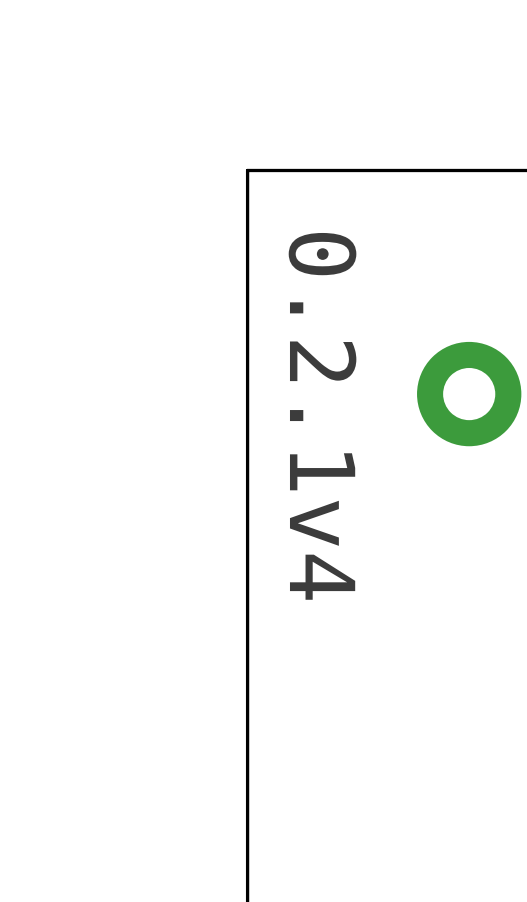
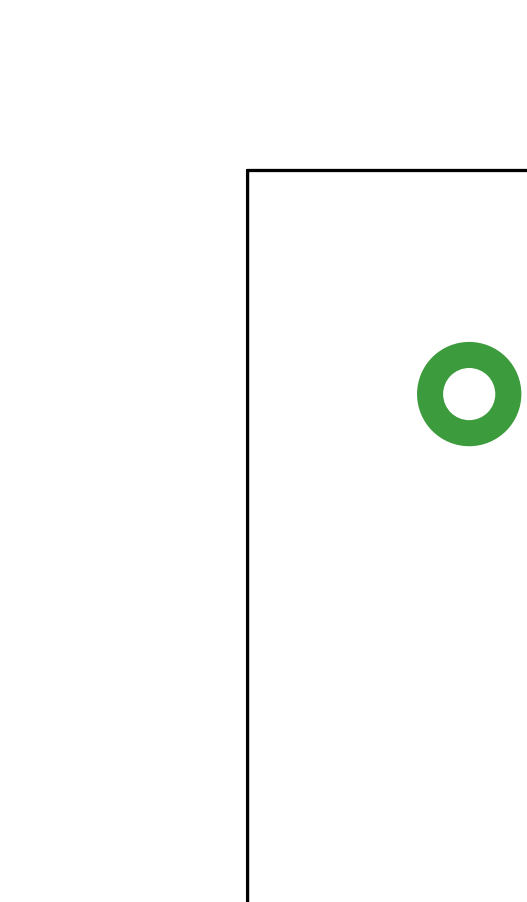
text: 0.2.1v4 (322, 416) -> none

